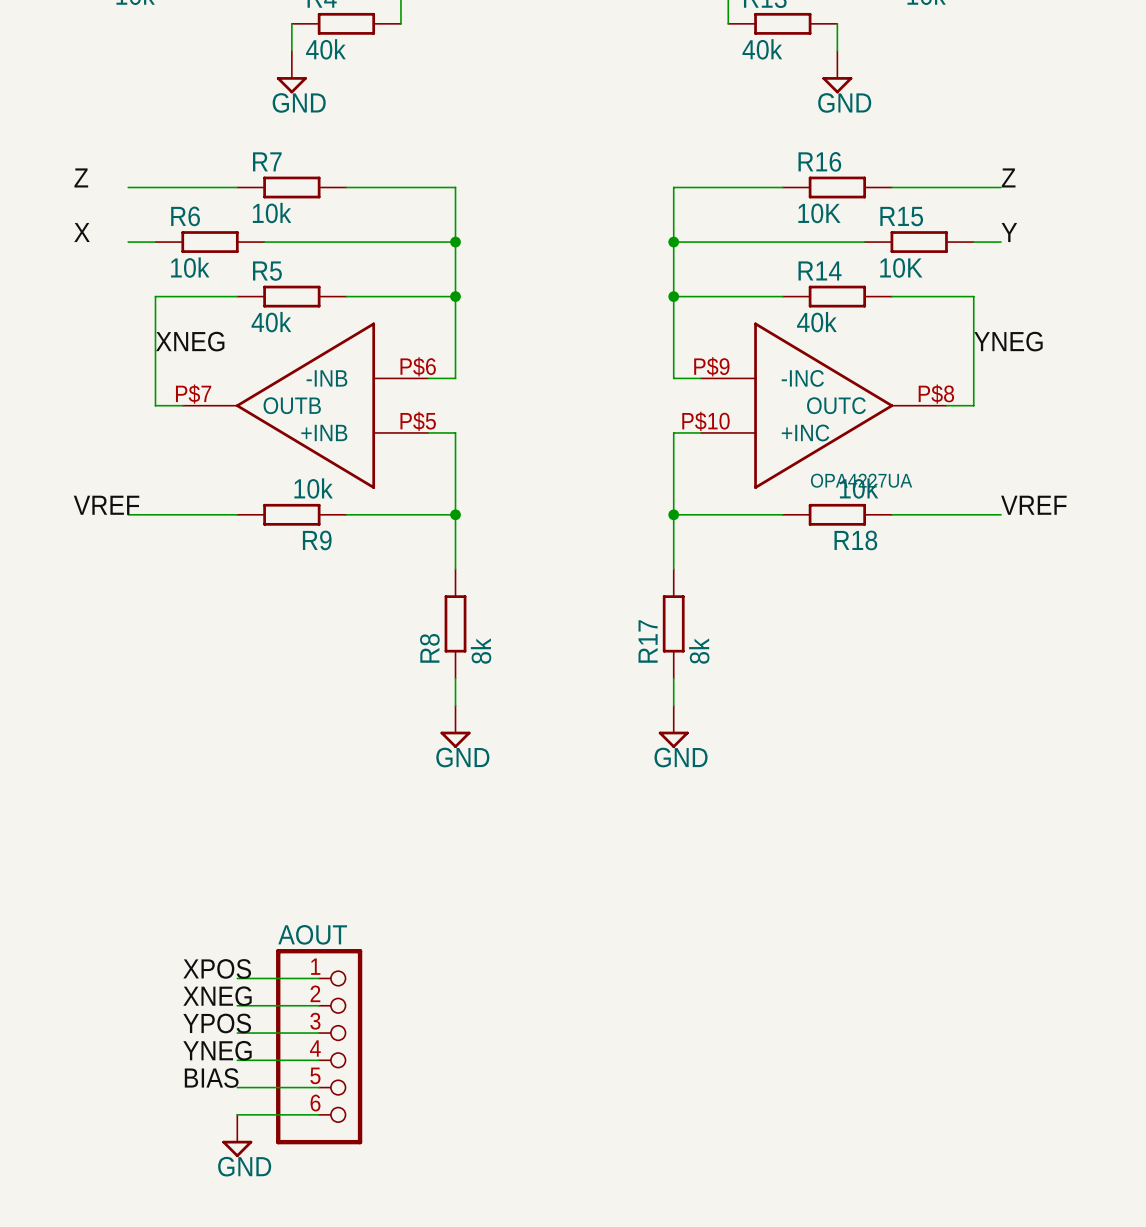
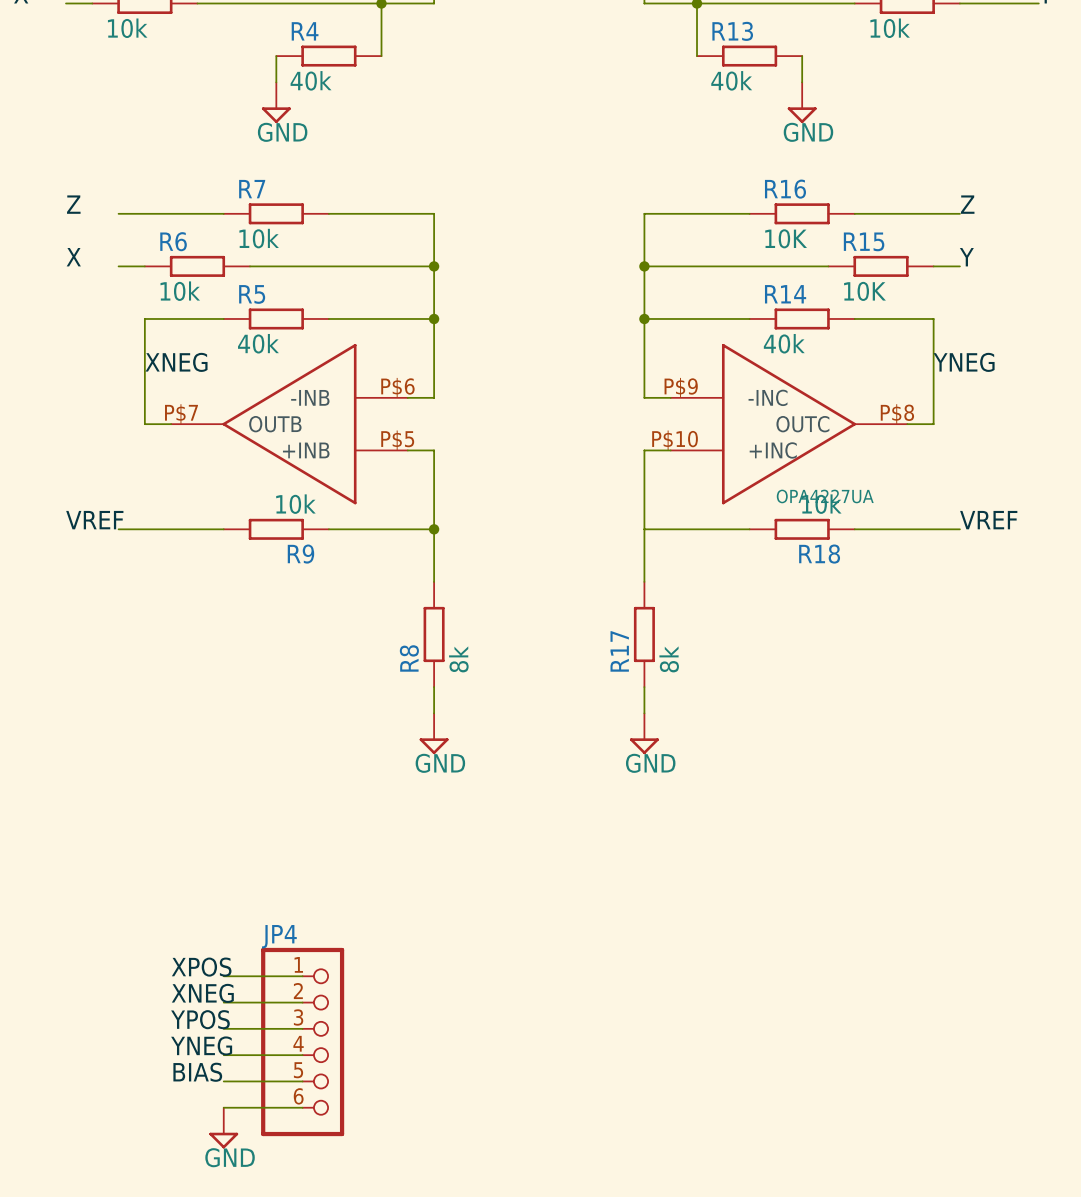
junction: (673, 514) -> none
AOUT name: AOUT (312, 934) -> JP4 (279, 936)

